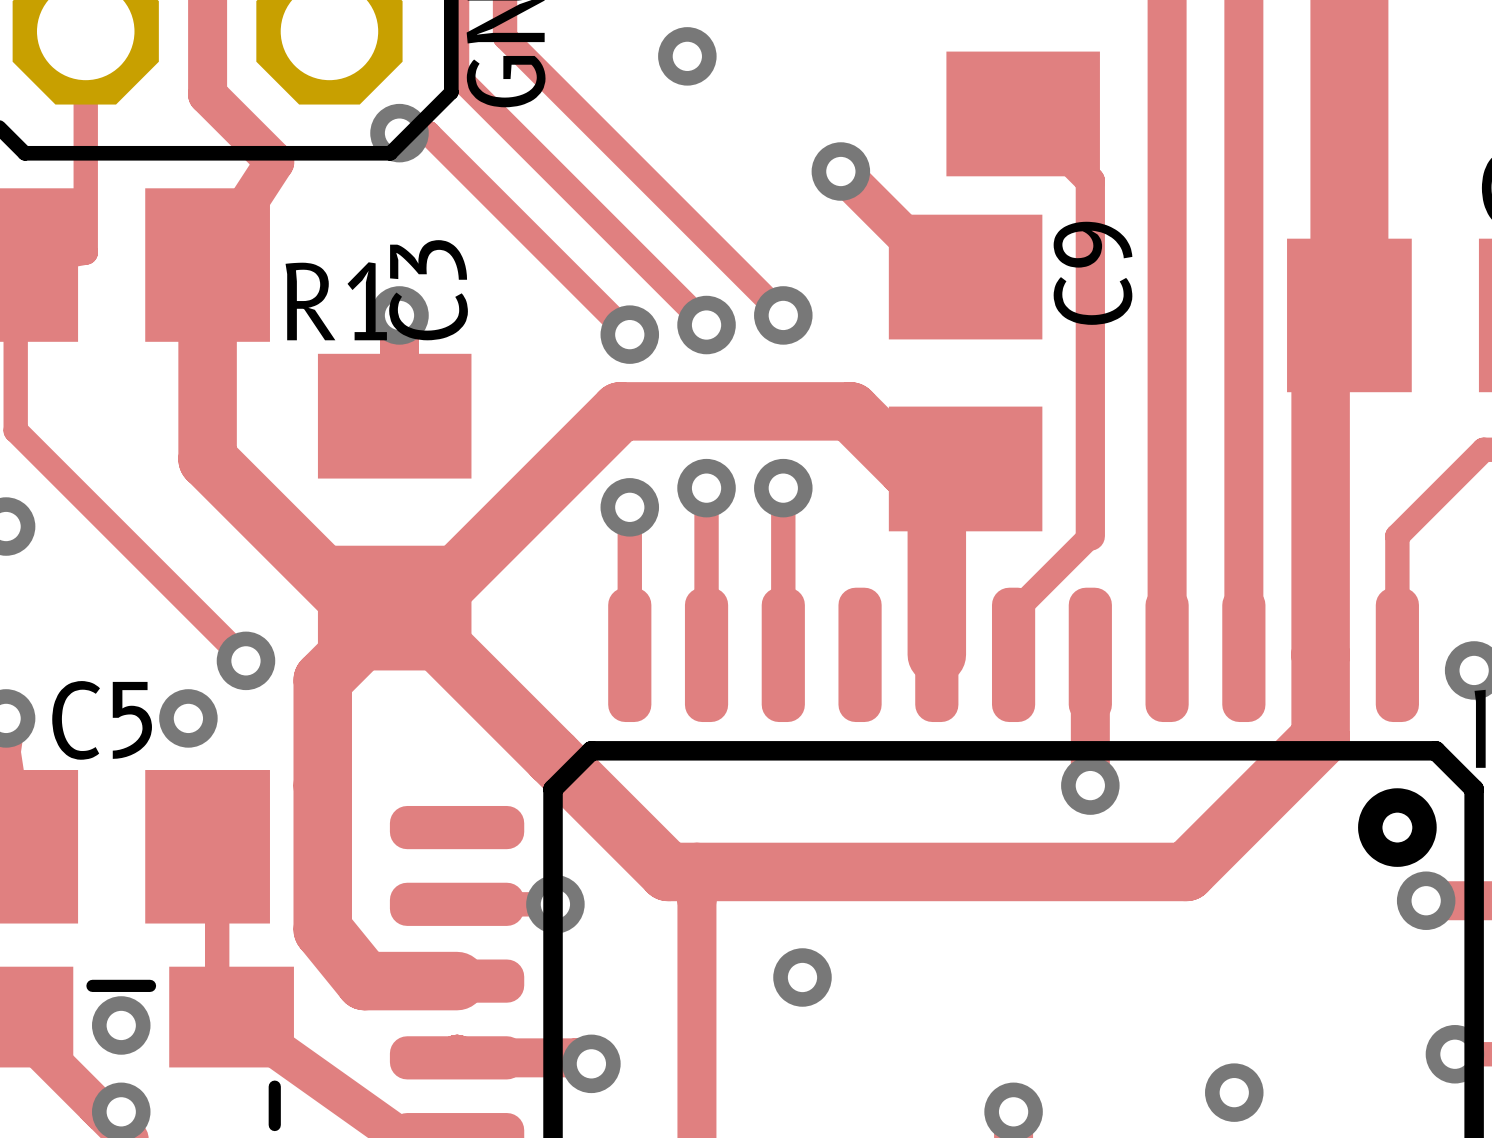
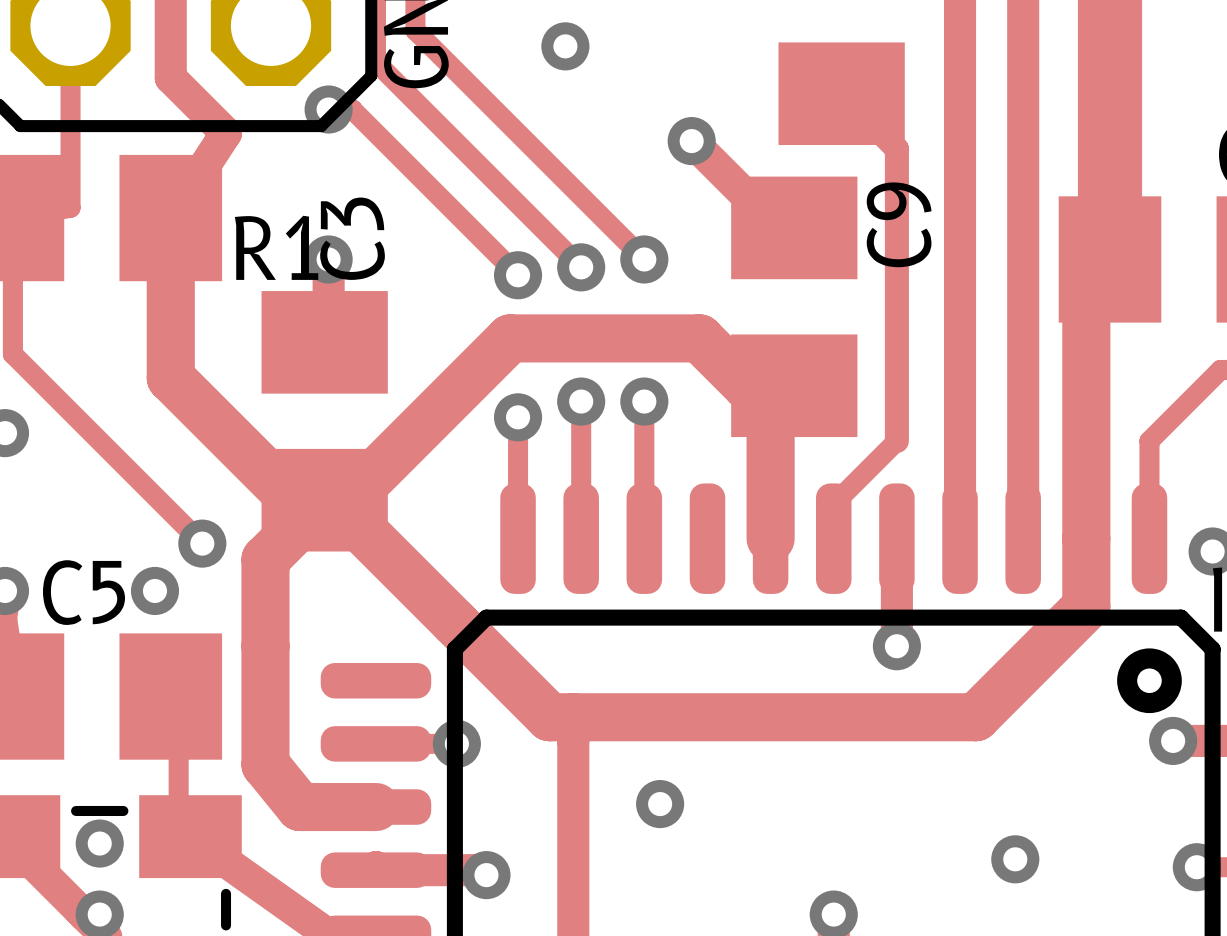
via position: (1234, 1092) -> (1015, 859)

